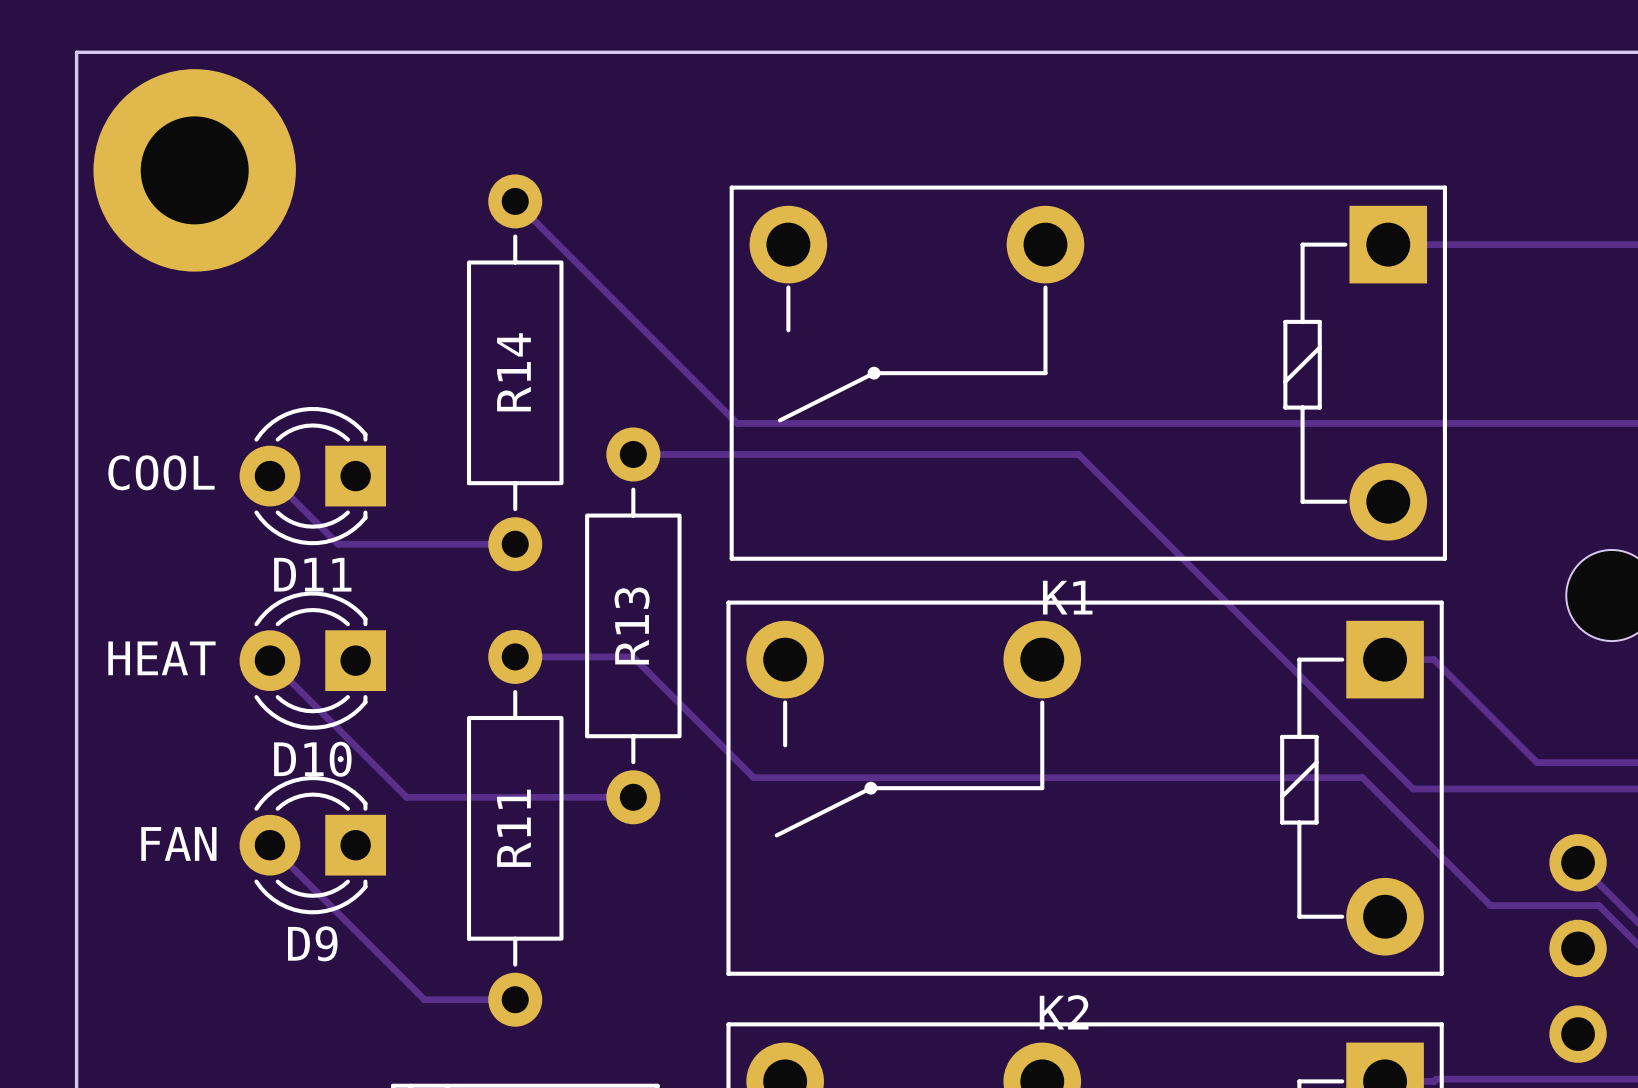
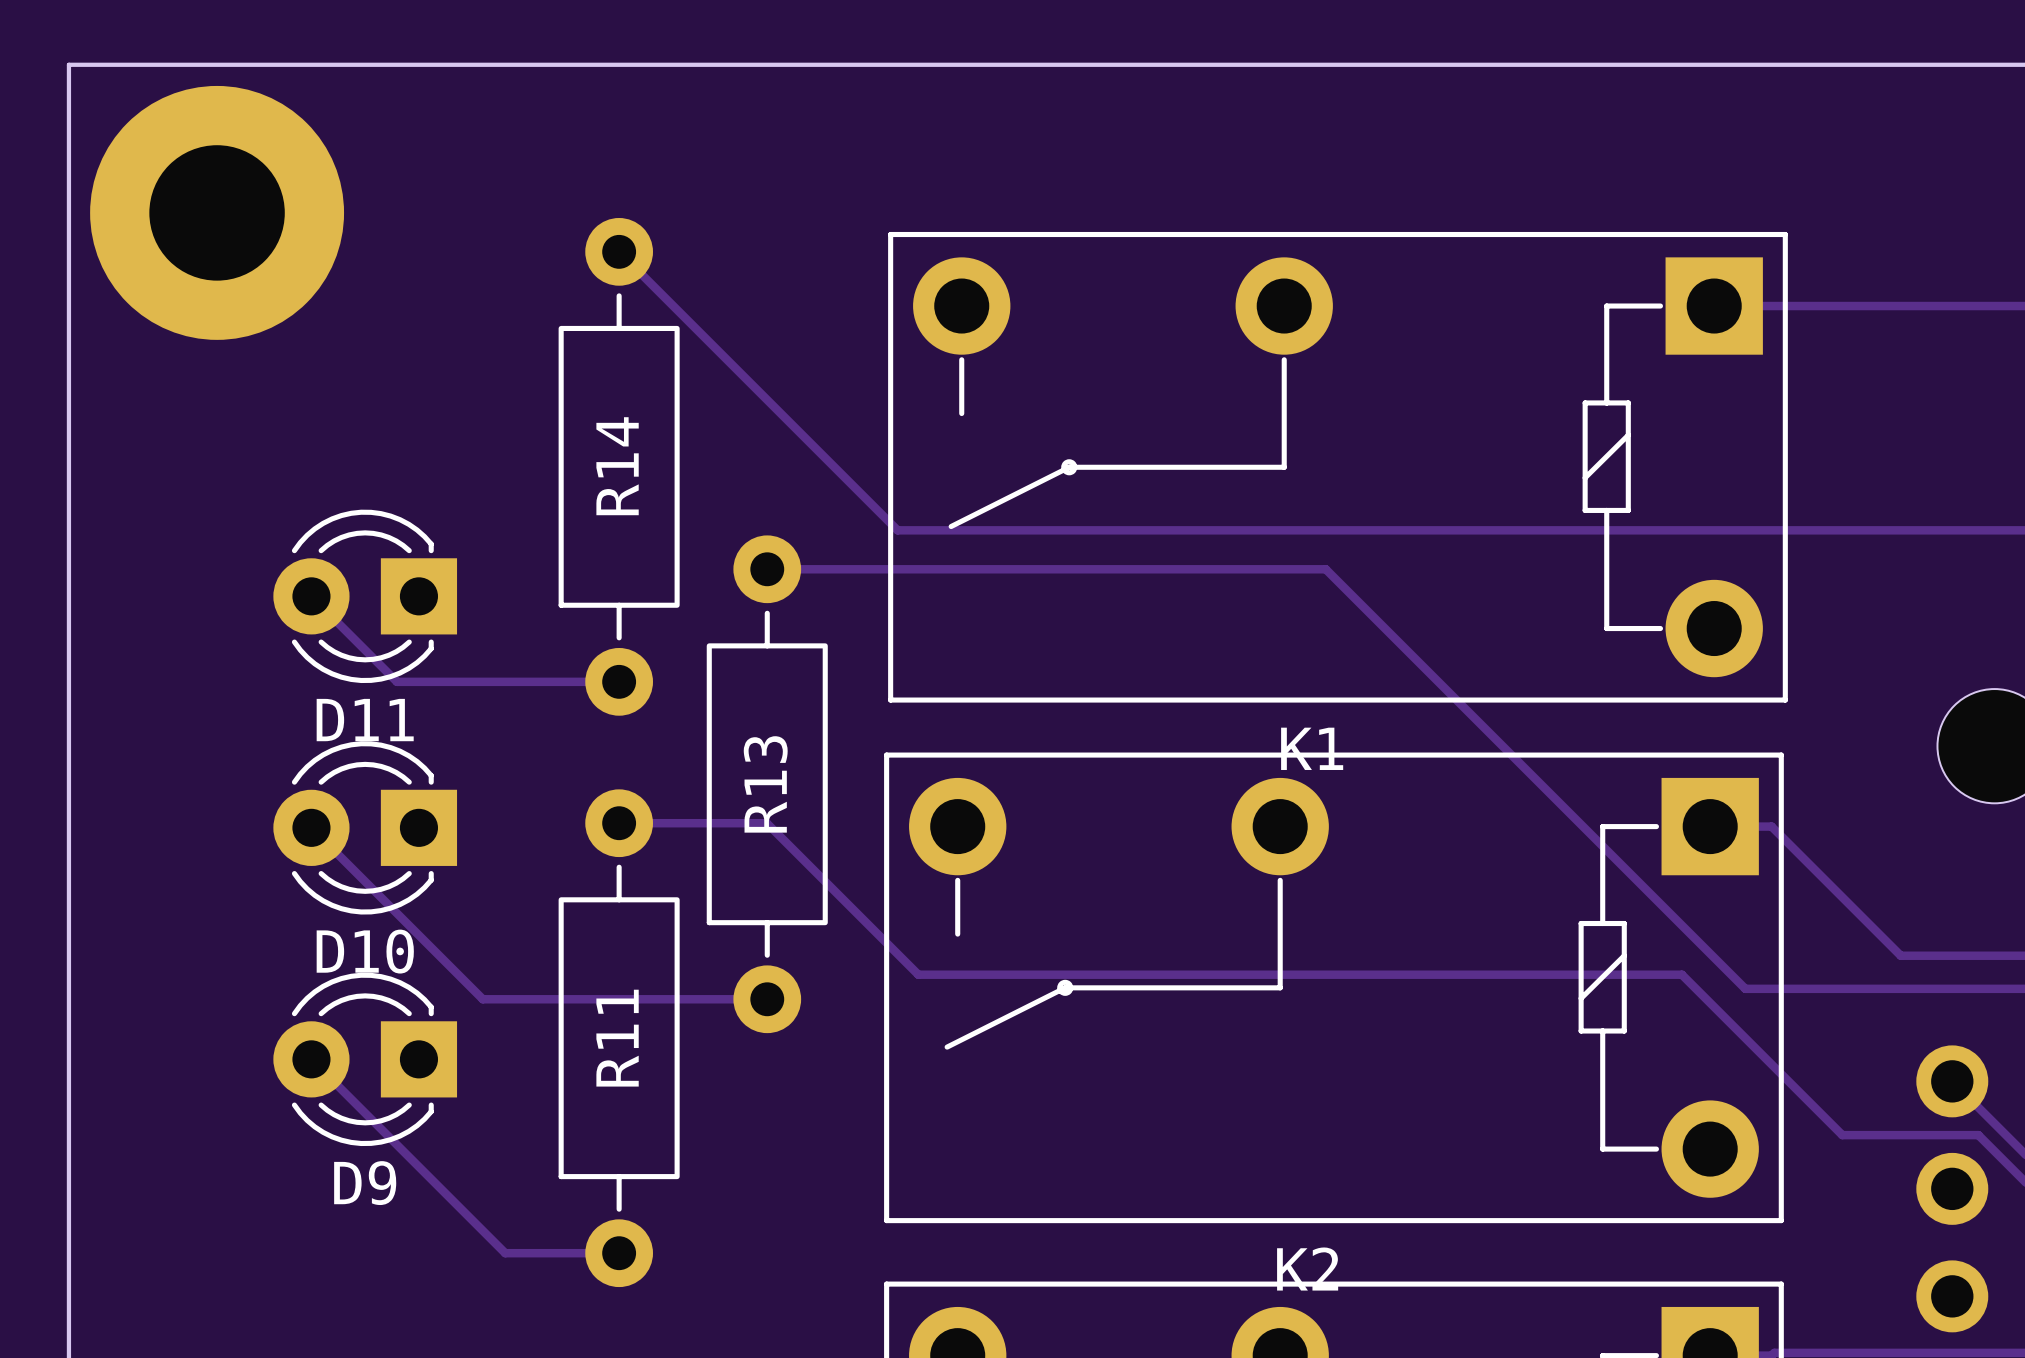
D11 value: COOL (161, 472) -> none
D10 value: HEAT (161, 658) -> none
D9 value: FAN (178, 843) -> none

